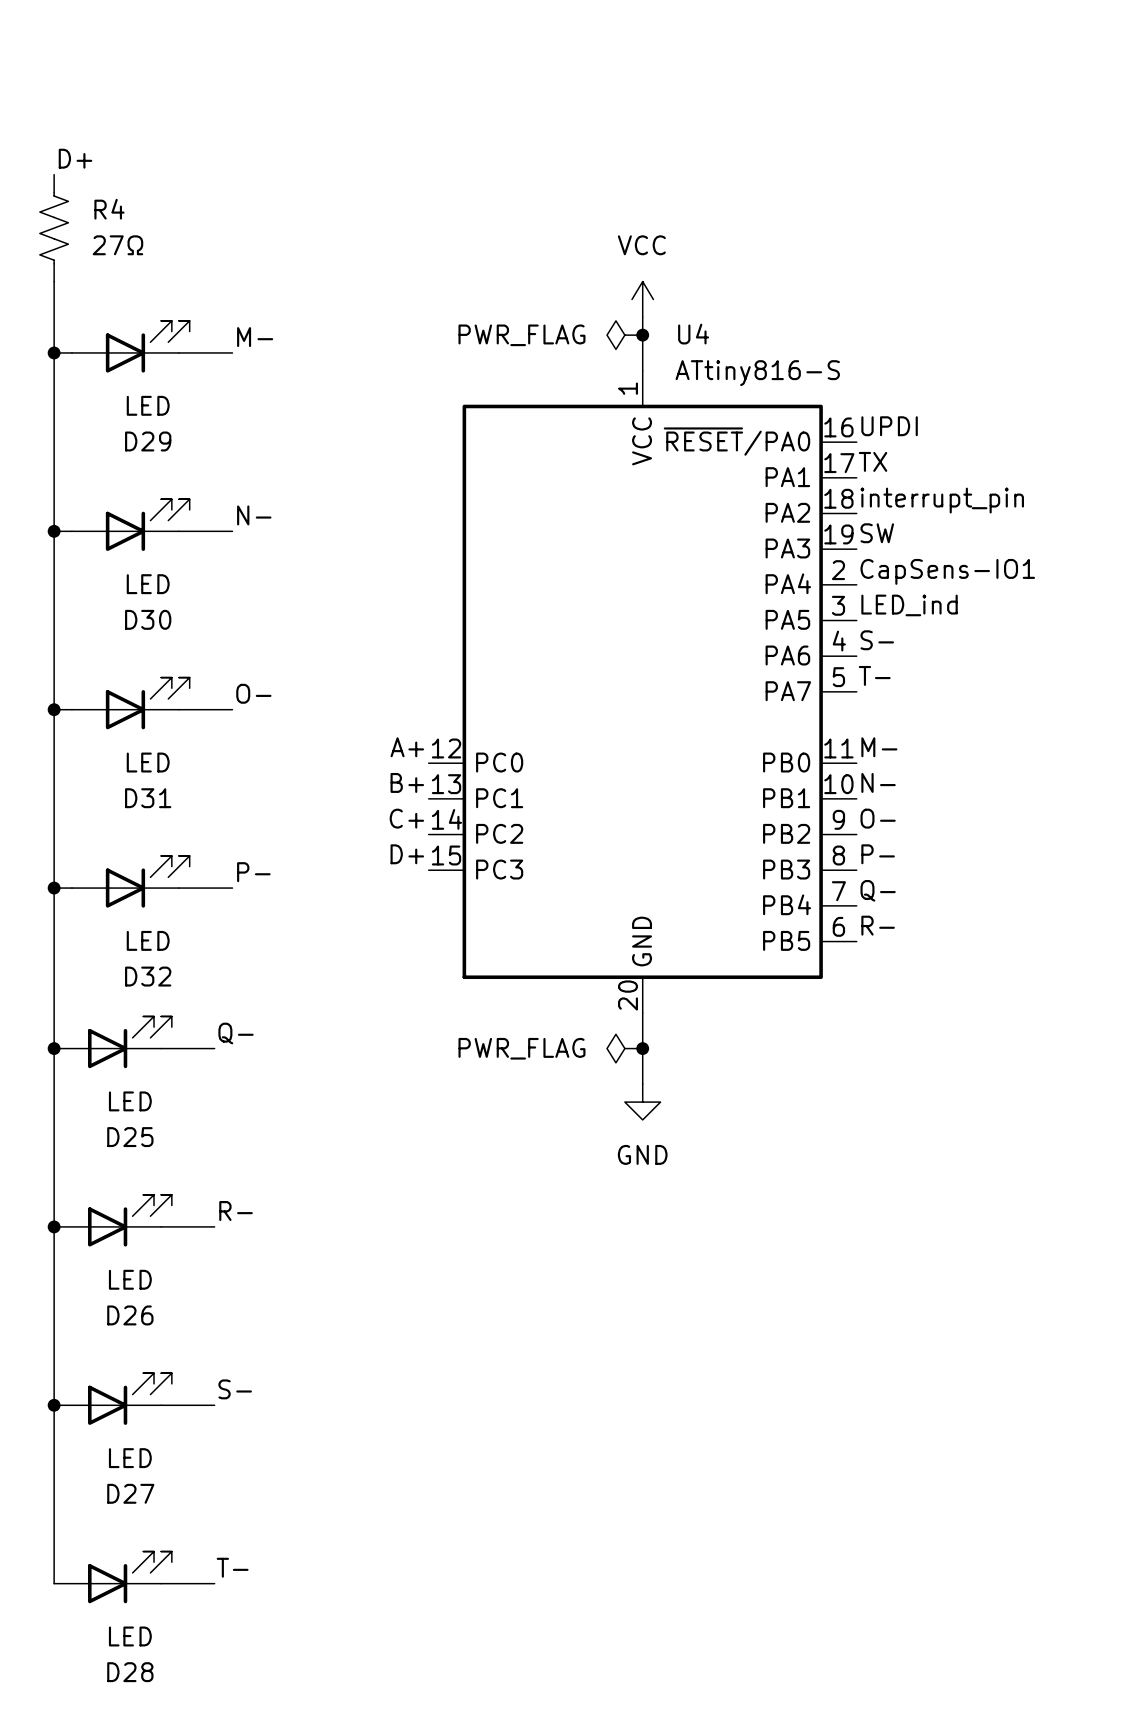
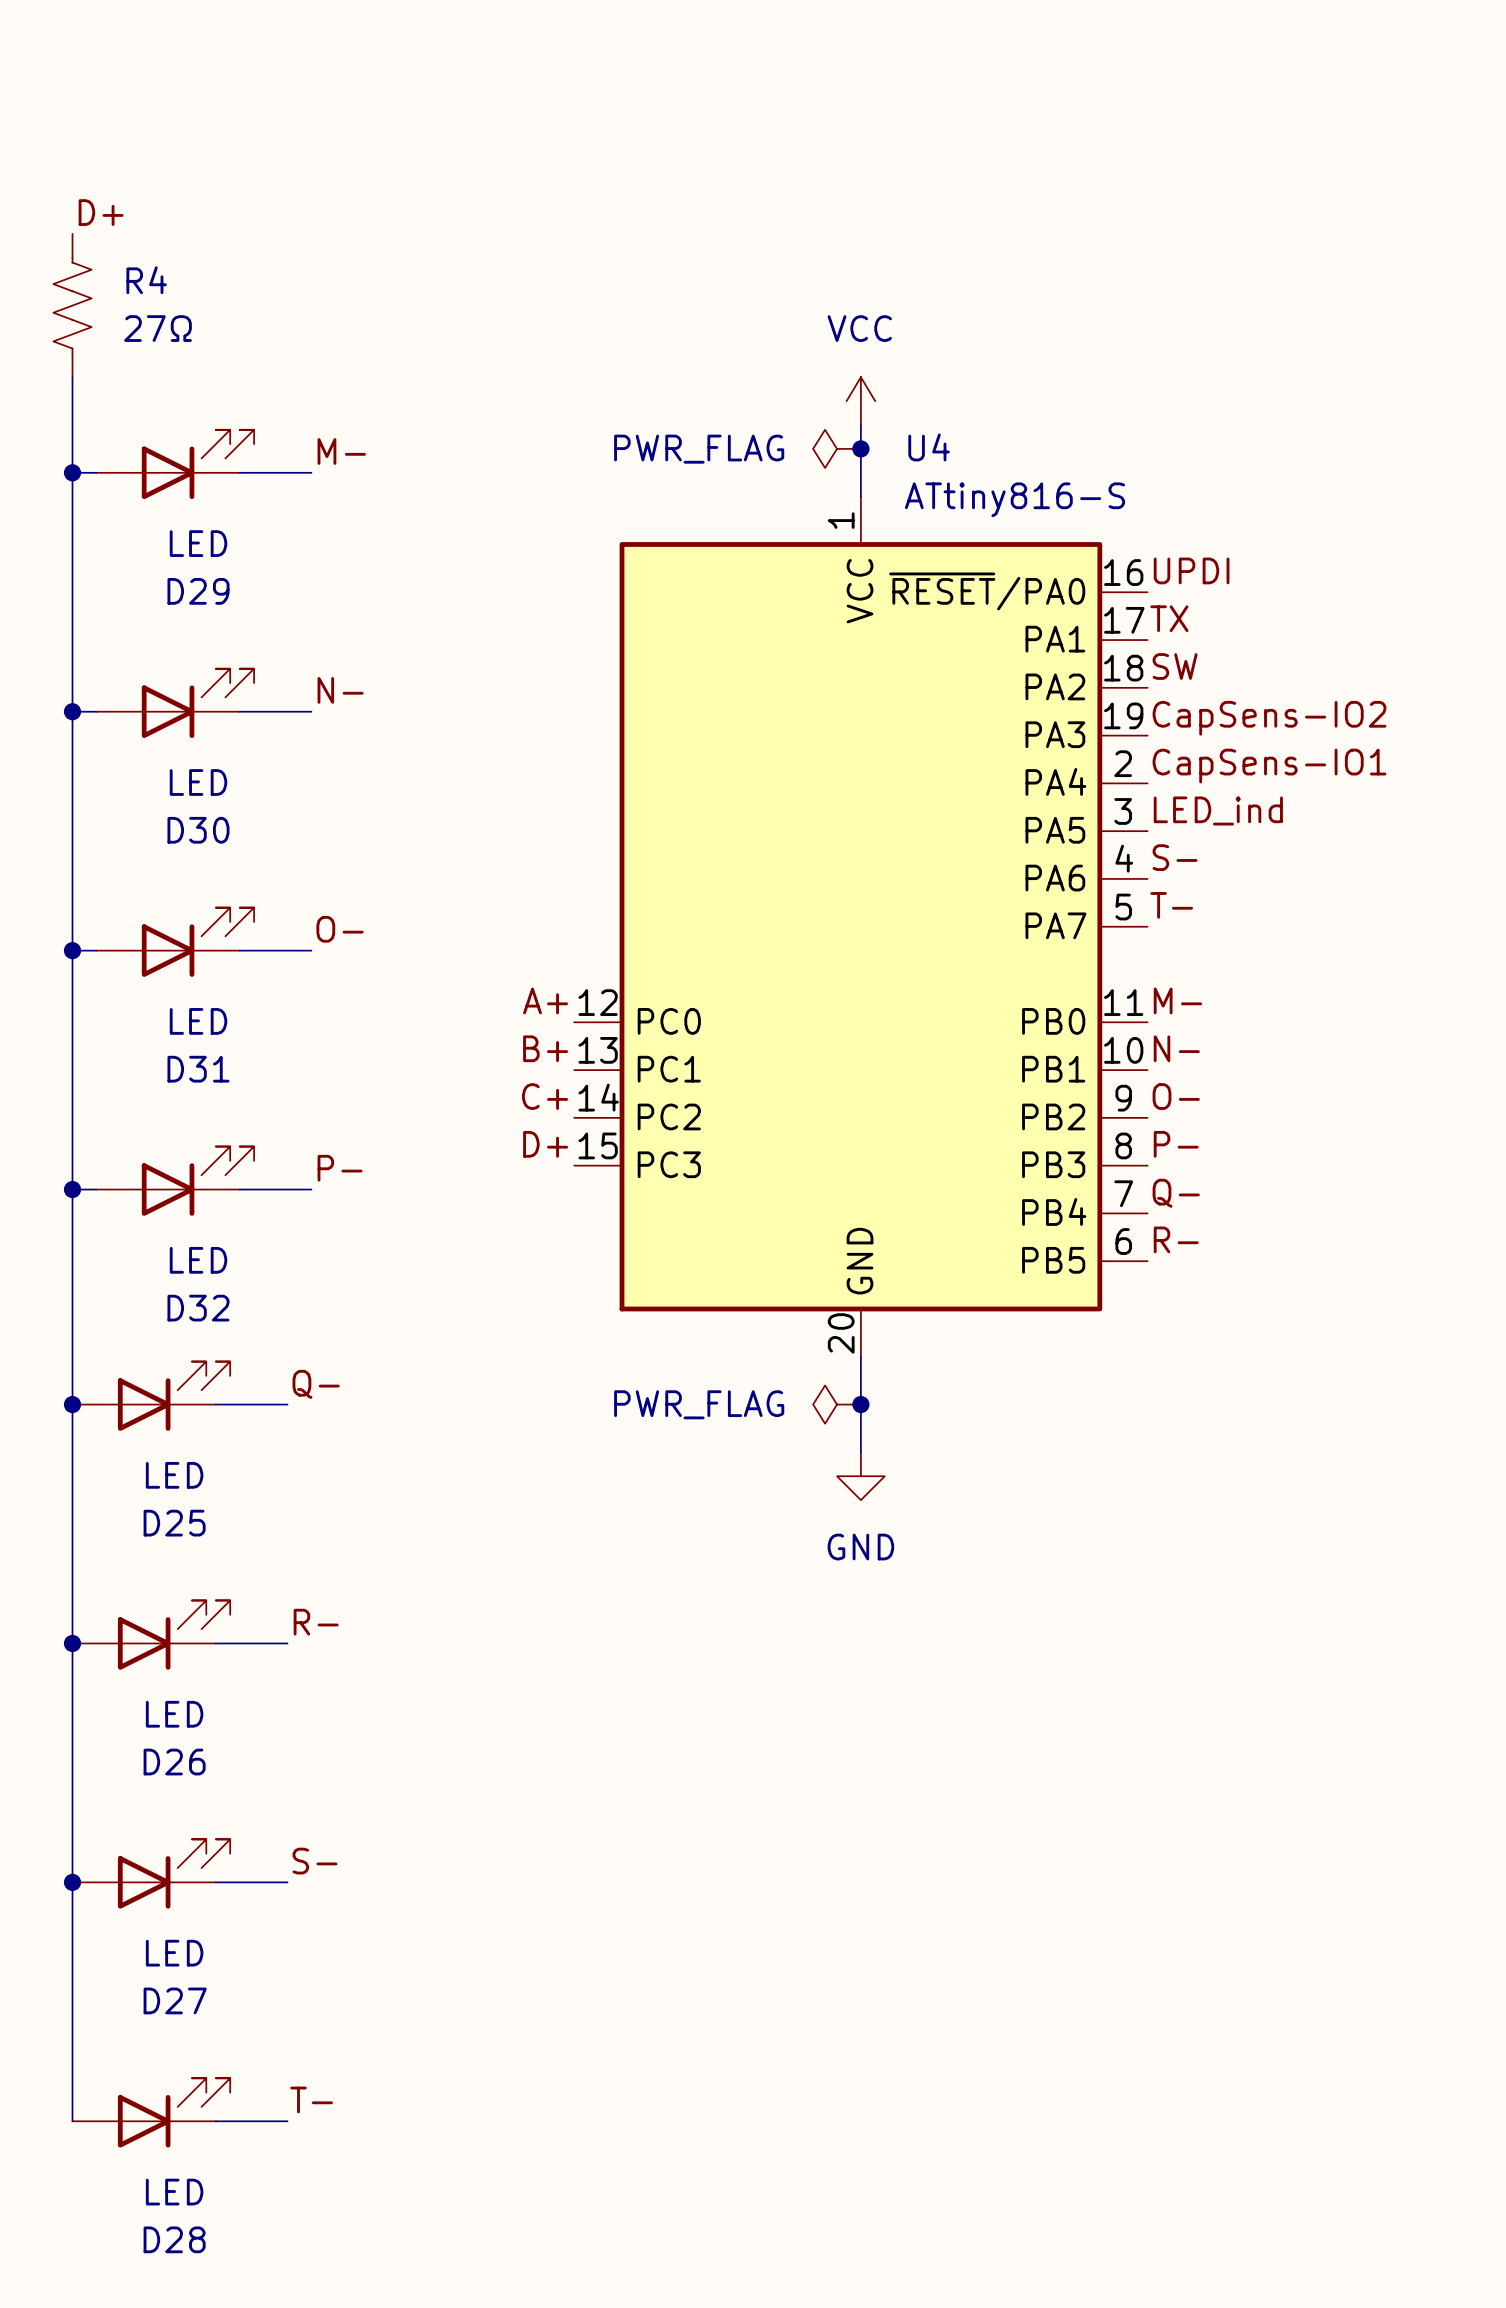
label: interrupt_pin (942, 500) -> SW (1175, 666)
label: SW (877, 533) -> CapSens-IO2 (1269, 718)

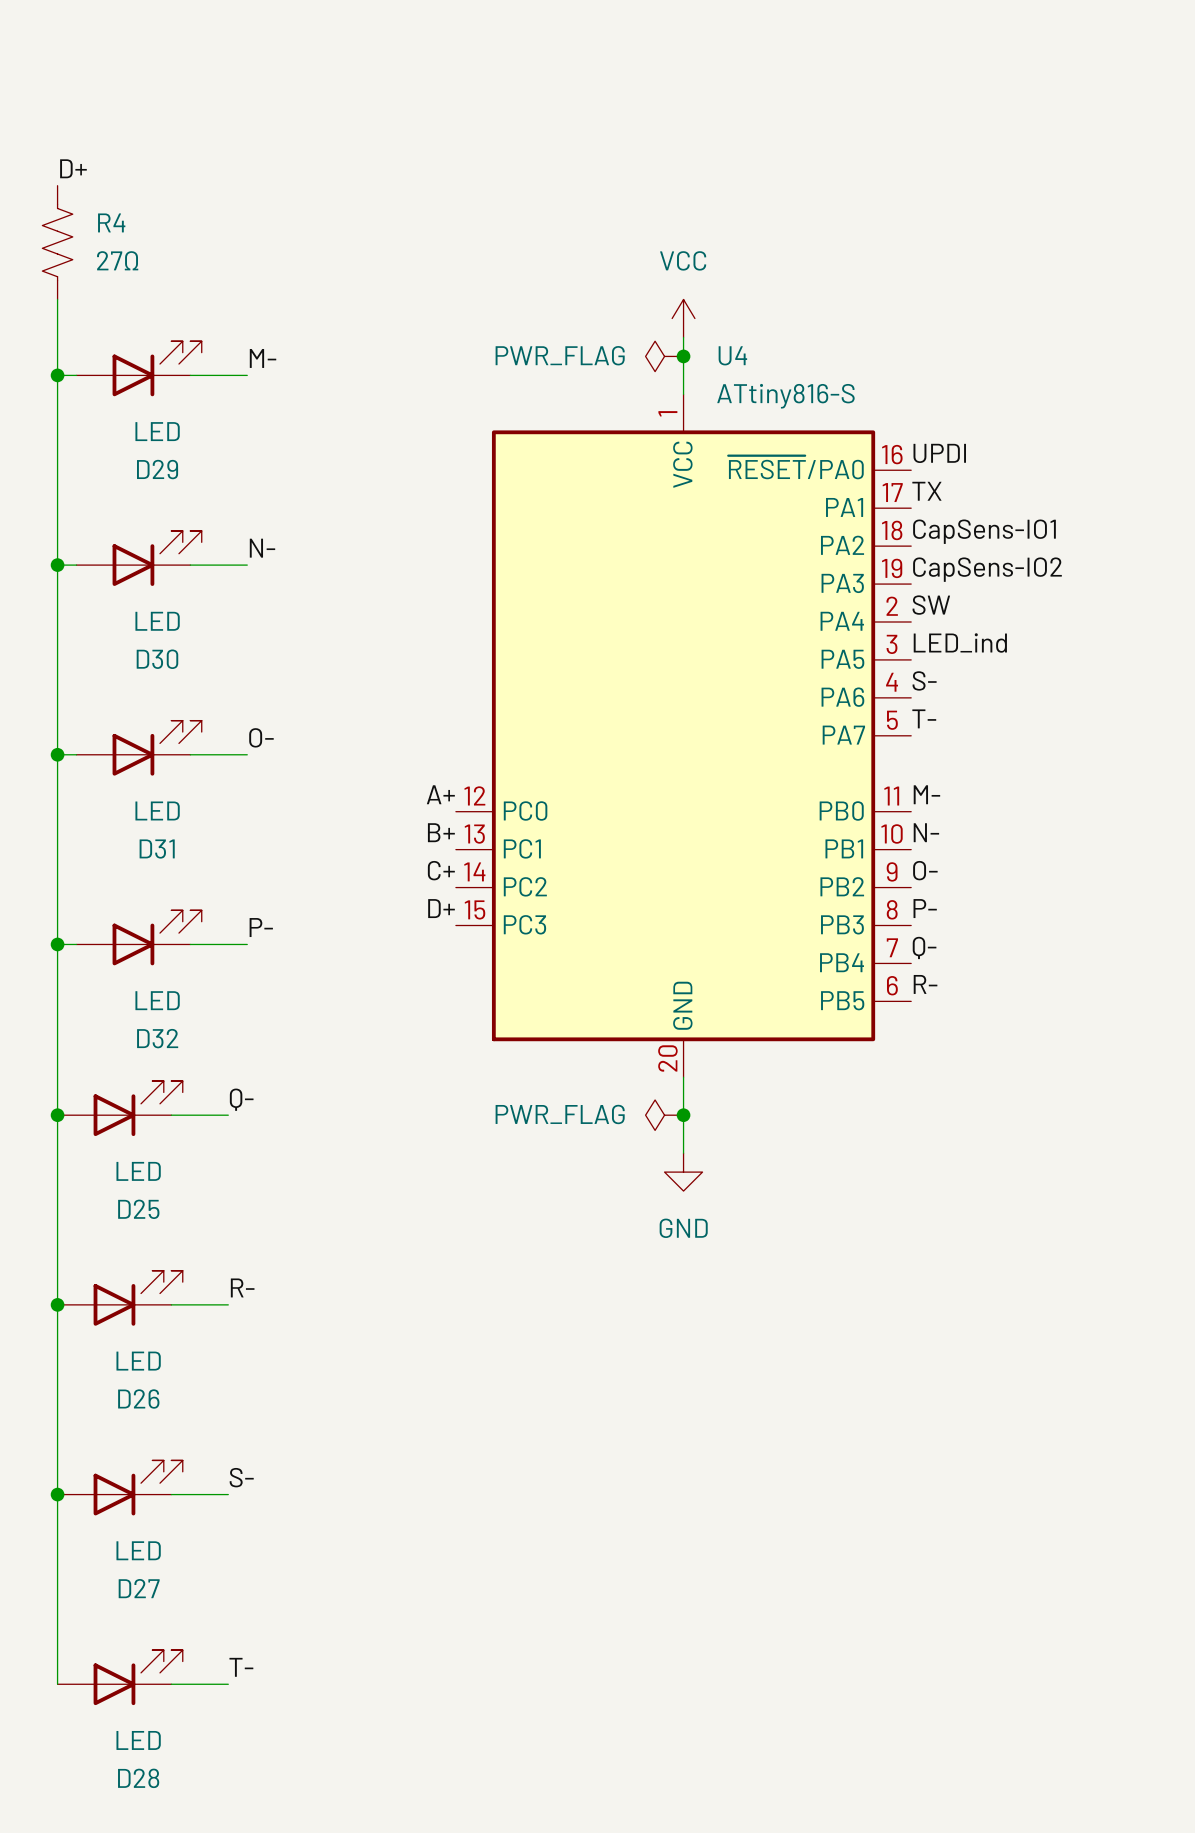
label: SW (1175, 666) -> CapSens-IO1 (984, 531)
label: CapSens-IO1 (1269, 766) -> SW (931, 605)

